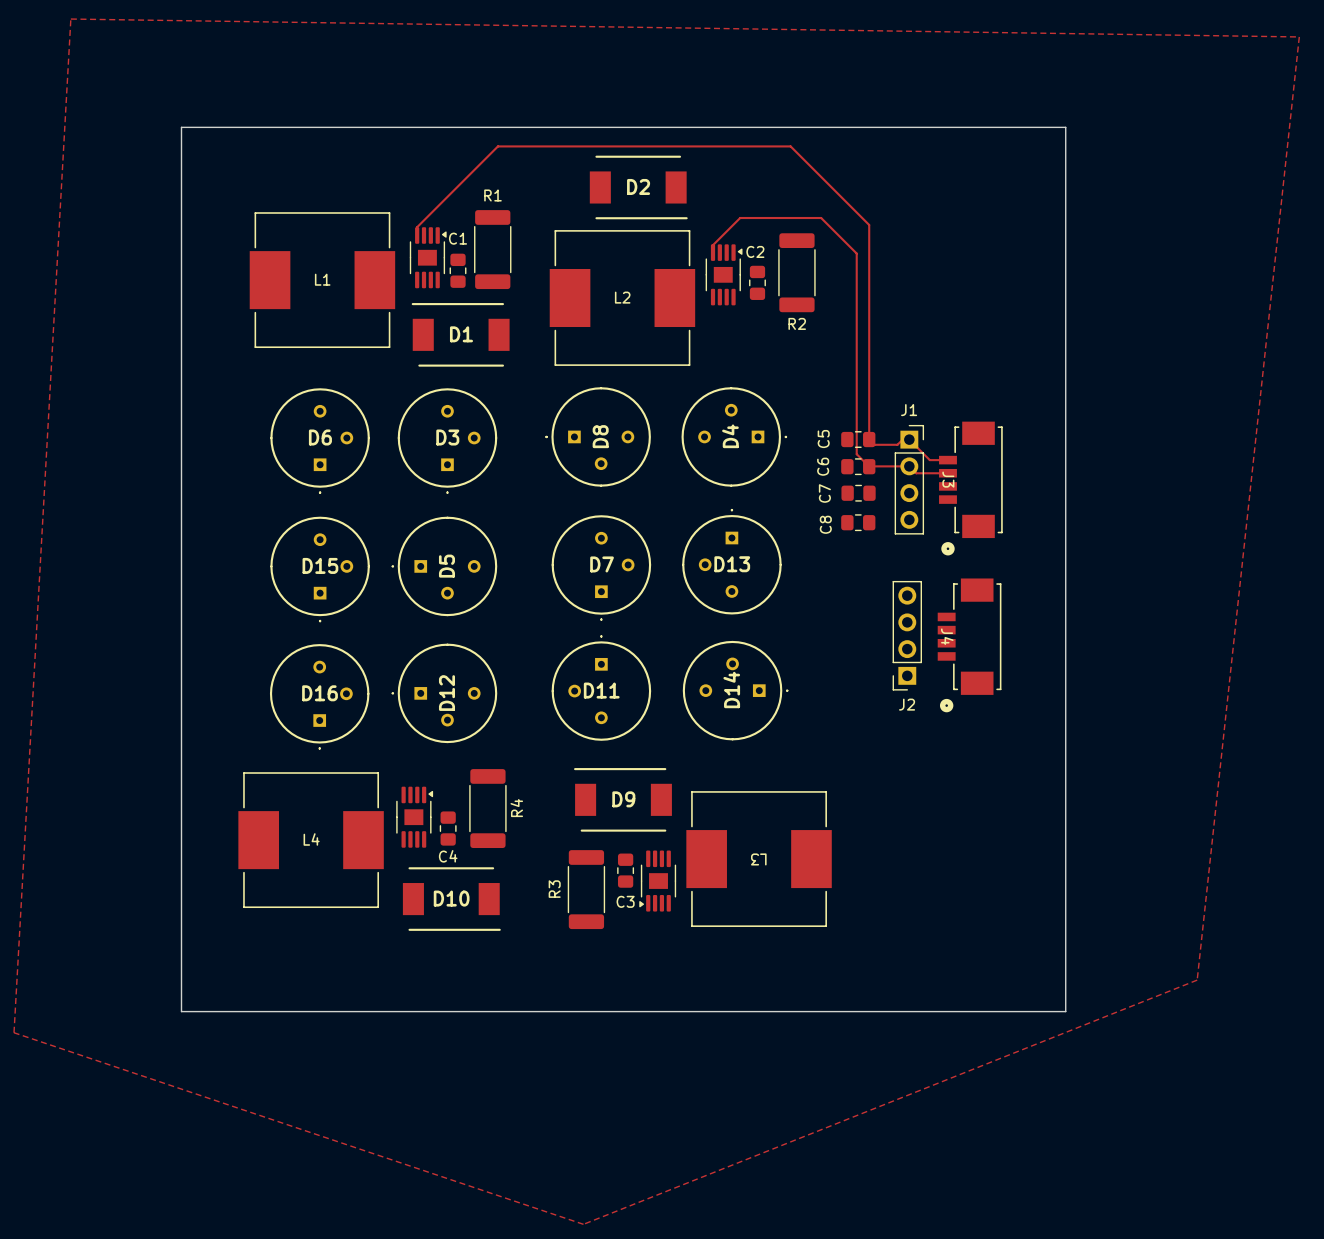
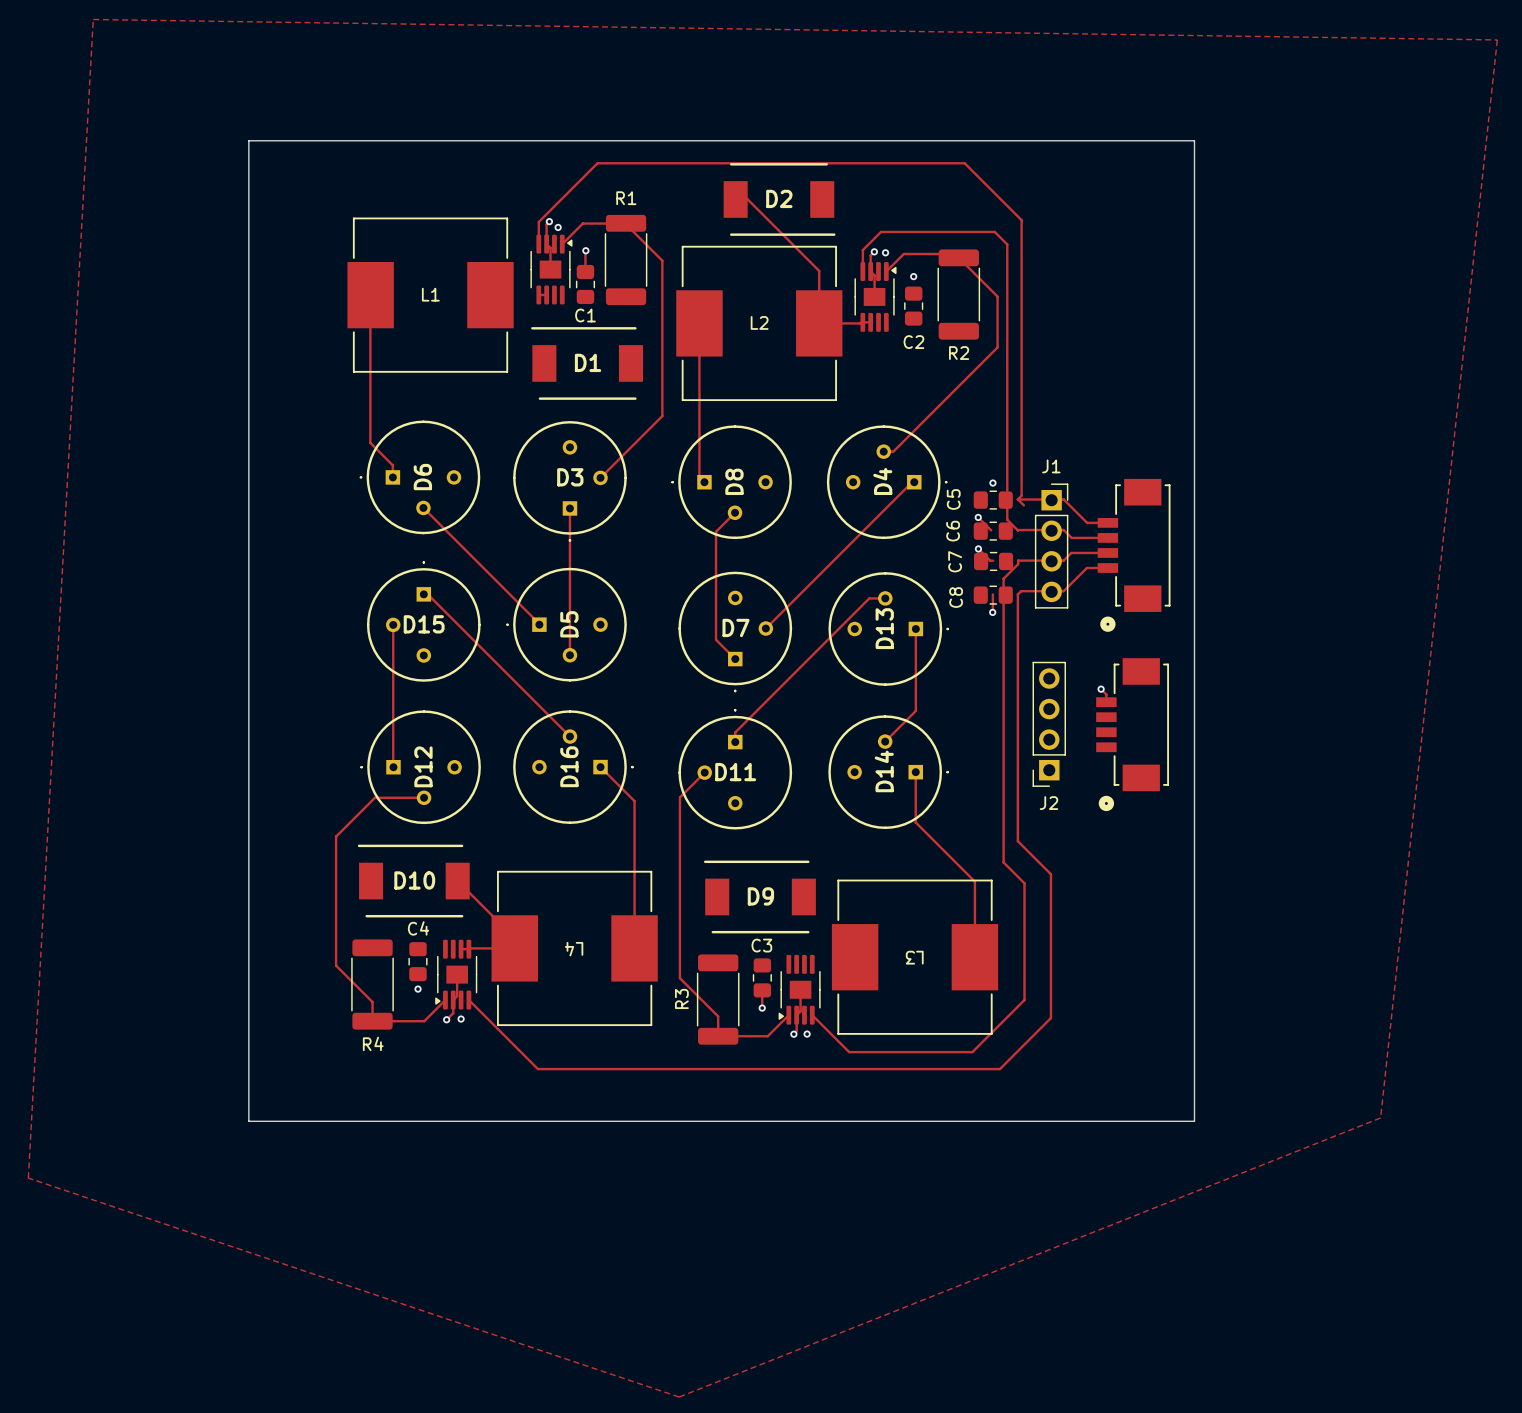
board edge: (181, 127) (1065, 127) (1065, 1011) (181, 1011) (181, 127) -> (248, 140) (248, 1121) (1194, 1121) (1194, 140) (248, 140)
track: none -> (735, 199) (747, 199) (819, 270) (819, 323) (870, 322)
D2 position: (638, 187) -> (779, 199)
track: none -> (549, 221) (546, 224) (546, 244) (550, 248) (550, 269)
via: none -> (549, 221)
via: none -> (558, 227)
track: none -> (538, 244) (538, 222) (597, 163) (964, 163) (1021, 220) (1021, 495) (1017, 499) (1023, 505)
track: none -> (562, 244) (582, 223) (625, 223) (662, 260) (662, 416) (600, 477)
track: none -> (585, 250) (585, 271)
via: none -> (585, 250)
track: none -> (874, 251) (870, 255) (870, 271) (874, 275) (874, 296)
via: none -> (874, 251)
via: none -> (885, 252)
track: (417, 235) (417, 227) (497, 146) (790, 146) (869, 224) (869, 439) (874, 444) (897, 444) (902, 439) (909, 439) (929, 460) (947, 460) -> none
C1 name position: C1 (458, 238) -> C1 (585, 315)
track: none -> (862, 271) (862, 250) (880, 231) (994, 231) (1007, 244) (1007, 490)
track: none -> (886, 271) (903, 253) (954, 253) (997, 296) (997, 347) (893, 451) (883, 451)
via: none -> (913, 276)
R1 position: (492, 249) -> (626, 260)
C2 name position: C2 (755, 251) -> C2 (913, 342)
track: (713, 252) (713, 245) (740, 218) (821, 218) (856, 253) (856, 454) (869, 466) (909, 466) (916, 473) (947, 473) -> none
track: none -> (370, 288) (370, 442) (392, 465) (392, 477)
part position: (428, 257) -> (551, 269)
track: none -> (538, 294) (546, 294)
C1 position: (458, 270) -> (585, 284)
R2 position: (796, 272) -> (958, 294)
part position: (724, 274) -> (875, 296)
L1 position: (322, 280) -> (430, 295)
C2 position: (757, 282) -> (913, 306)
track: none -> (699, 323) (699, 477) (704, 482)
L2 position: (622, 298) -> (759, 323)
D1 position: (460, 334) -> (587, 363)
track: none -> (914, 482) (912, 482) (765, 628)
via: none -> (992, 483)
D8 position: (598, 436) -> (731, 482)
D4 position: (734, 436) -> (887, 482)
track: none -> (1017, 499) (1063, 499) (1087, 522) (1107, 522)
D6 rotation: 0° (320, 440) -> 90° clockwise (420, 477)
D3 position: (447, 440) -> (569, 481)
track: none -> (423, 507) (539, 624)
track: none -> (569, 508) (569, 655)
track: none -> (1007, 508) (1007, 519) (1017, 530) (1063, 530) (1071, 537) (1107, 537)
track: none -> (735, 512) (716, 531) (716, 639) (735, 659)
track: none -> (978, 517) (991, 530)
via: none -> (978, 517)
track: none -> (978, 548) (990, 560) (993, 560)
via: none -> (978, 548)
track: none -> (1107, 552) (1071, 552) (1063, 560) (1018, 560)
part: none -> (1134, 555)
J3: (970, 488) -> none
track: none -> (1018, 560) (1018, 564) (1003, 578) (1003, 862) (1024, 883) (1024, 1000) (972, 1052) (849, 1052) (812, 1015)
track: none -> (1107, 568) (1086, 568) (1063, 591) (1021, 591) (1017, 594) (1017, 841) (1050, 874) (1050, 1018) (999, 1069) (537, 1069) (468, 1000)
track: none -> (423, 594) (427, 594) (569, 736)
track: none -> (992, 594) (992, 612)
track: none -> (885, 598) (869, 598) (735, 732) (735, 742)
via: none -> (992, 612)
track: none -> (393, 624) (393, 767)
track: none -> (915, 629) (915, 710) (885, 741)
D13 rotation: 0° (731, 561) -> 90° clockwise (888, 629)
D5 position: (444, 566) -> (566, 624)
D7 position: (601, 567) -> (735, 631)
D15 rotation: 0° (320, 569) -> 180° (423, 621)
track: none -> (1101, 689) (1106, 694) (1106, 702)
via: none -> (1101, 689)
part: none -> (1132, 734)
J4: (969, 645) -> none
track: none -> (600, 767) (634, 801) (634, 948)
track: none -> (915, 772) (915, 822) (974, 881) (975, 964)
track: none -> (704, 772) (679, 797) (679, 978) (718, 1016) (718, 1036) (767, 1036) (788, 1015)
D11 position: (601, 688) -> (735, 769)
D14 position: (735, 690) -> (888, 772)
D12 position: (444, 693) -> (420, 767)
D16 rotation: 0° (319, 696) -> 90° counterclockwise (573, 767)
D16 position: (319, 696) -> (573, 767)
track: none -> (424, 797) (374, 797) (336, 836)
track: none -> (336, 836) (336, 965) (372, 1002) (372, 1021) (424, 1021) (445, 1000)
track: none -> (457, 881) (514, 938) (514, 948) (461, 949)
D9 position: (622, 799) -> (759, 896)
R4 position: (487, 808) -> (372, 984)
R4 name rotation: 0° (516, 808) -> 90° clockwise (373, 1043)
R4 name position: R4 (516, 808) -> R4 (373, 1043)
part rotation: 0° (414, 817) -> 180° (456, 974)
part position: (414, 817) -> (456, 974)
C4 position: (448, 828) -> (417, 961)
L4 name rotation: 0° (311, 839) -> 180° (574, 949)
L4 position: (311, 840) -> (574, 948)
track: none -> (457, 974) (457, 996) (453, 1000) (453, 1013) (446, 1019)
C4 name position: C4 (448, 856) -> C4 (418, 928)
L3 position: (759, 859) -> (915, 957)
via: none -> (418, 989)
track: none -> (800, 989) (800, 1011) (796, 1015) (796, 1031) (793, 1034)
track: none -> (762, 990) (762, 1008)
C3 position: (625, 870) -> (762, 977)
part position: (657, 881) -> (799, 989)
via: none -> (762, 1008)
R3 position: (586, 889) -> (718, 999)
via: none -> (461, 1019)
via: none -> (446, 1019)
D10 rotation: 0° (451, 899) -> 180° (413, 881)
D10 position: (451, 899) -> (413, 881)
C3 name position: C3 (625, 901) -> C3 (761, 945)
via: none -> (793, 1034)
via: none -> (807, 1034)

